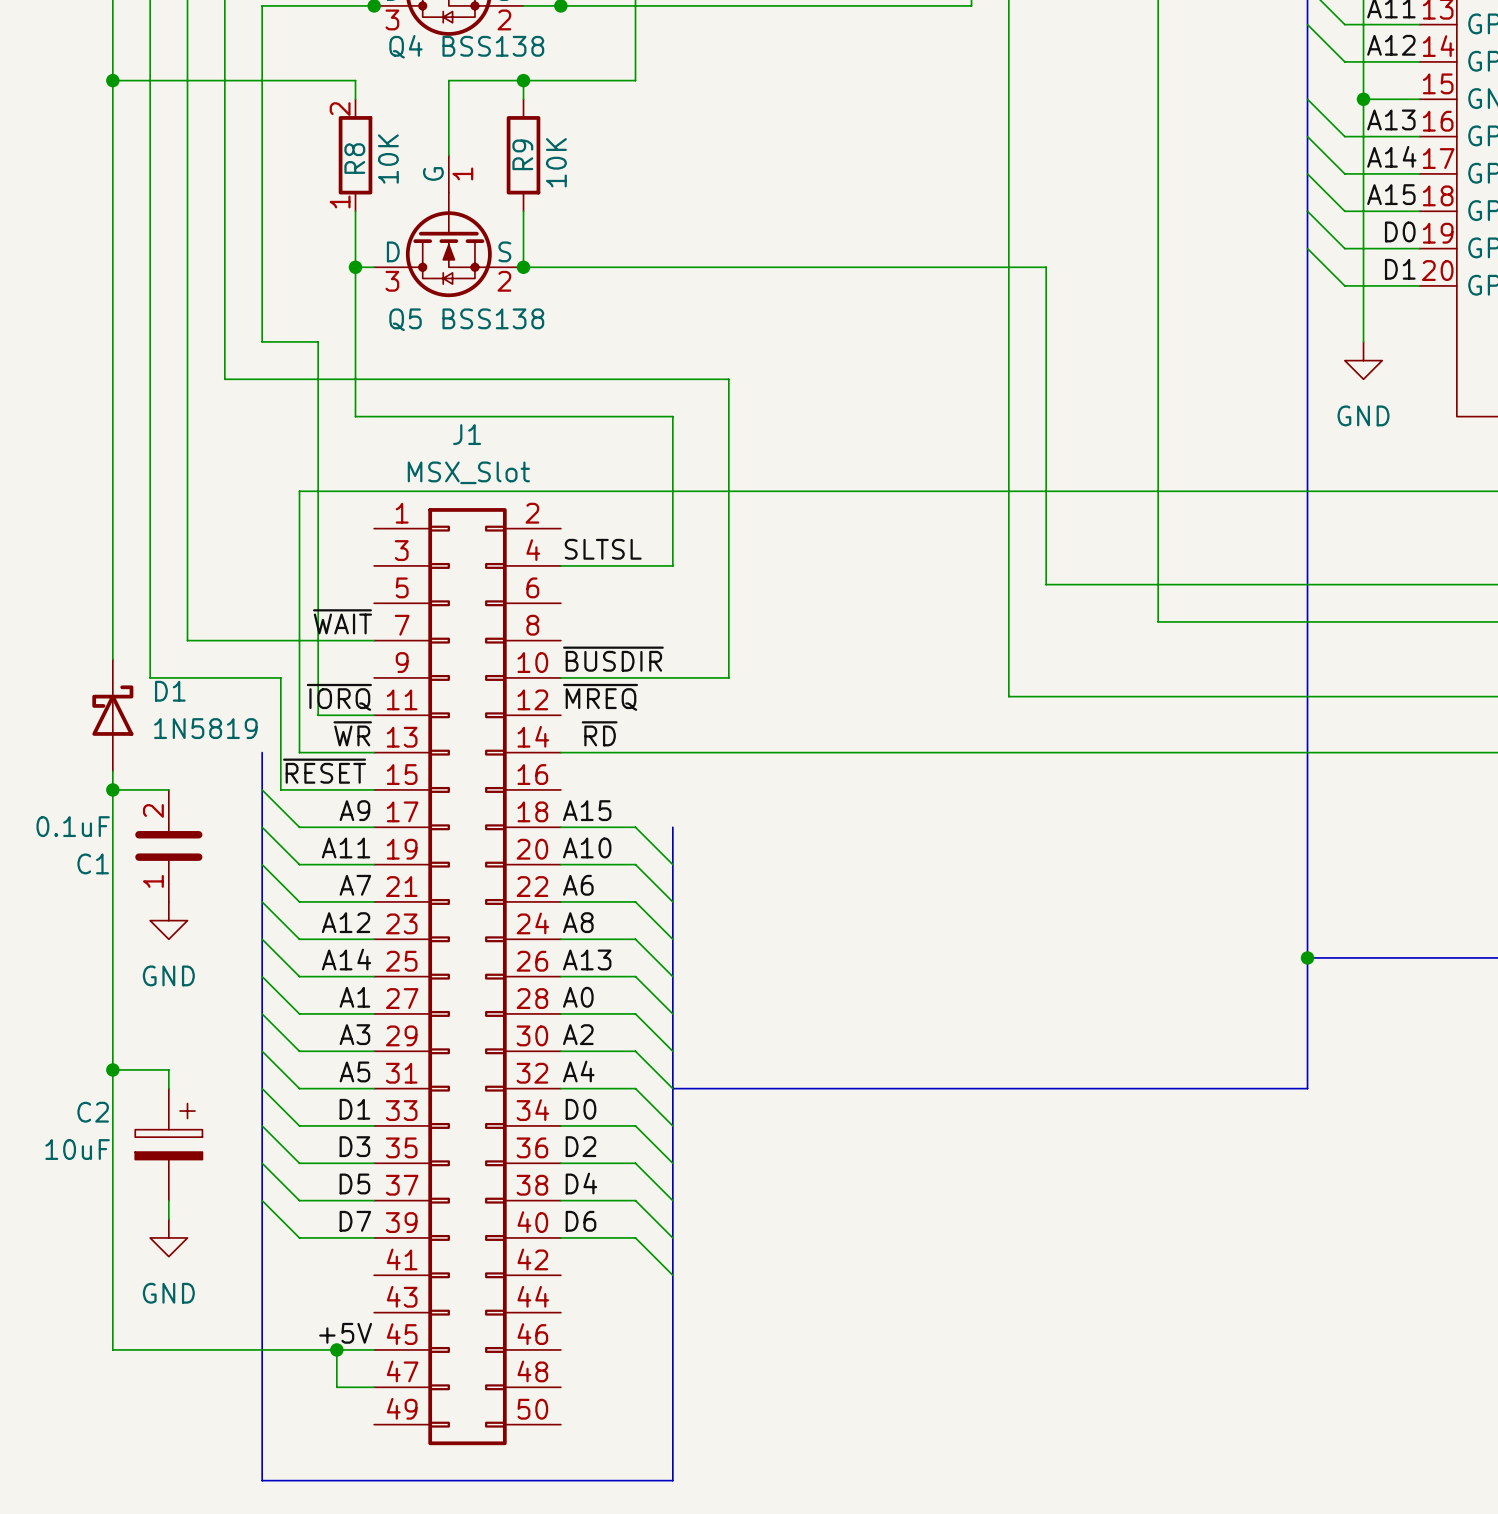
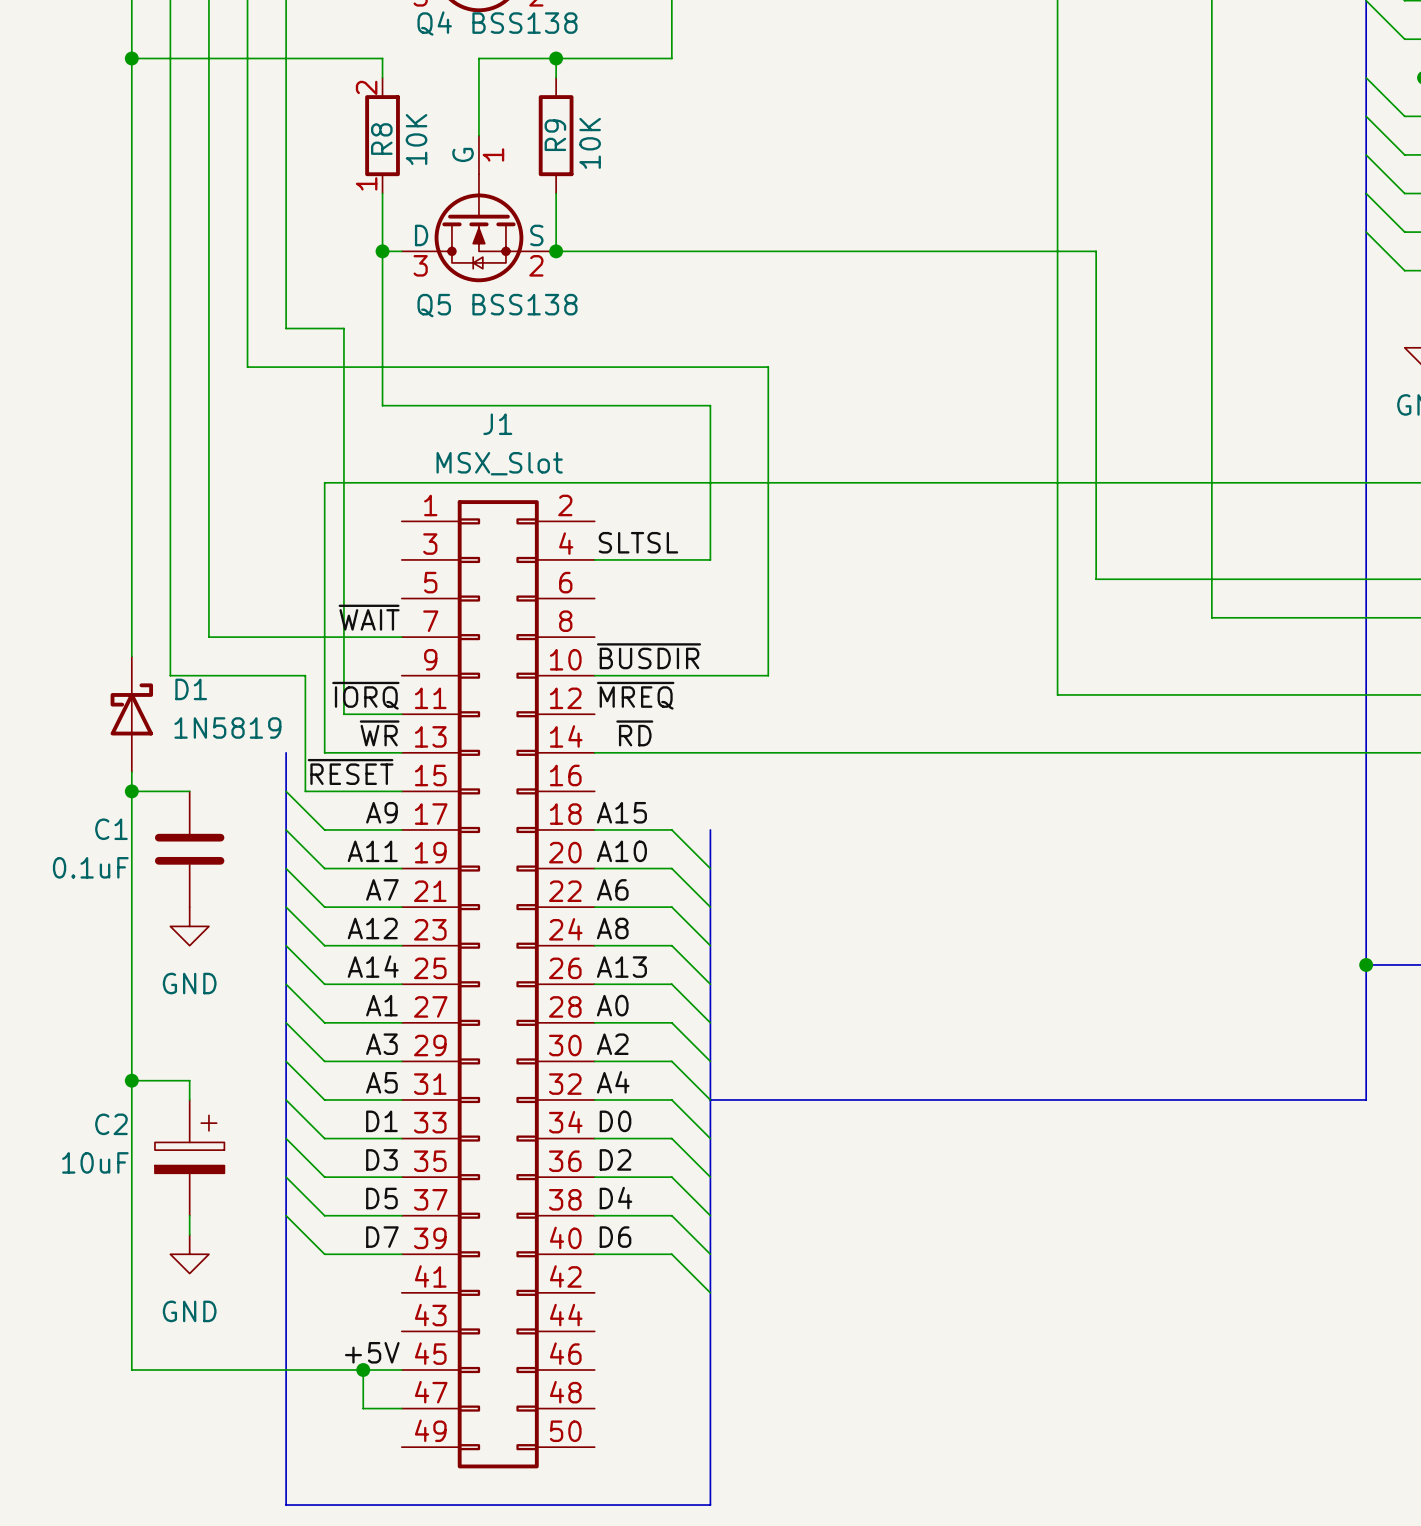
C1 pin number: 2 (153, 810) -> none
C1 value position: 0.1uF (73, 826) -> 0.1uF (90, 867)
C1 name position: C1 (93, 863) -> C1 (111, 829)
C1 pin number: 1 (153, 881) -> none

